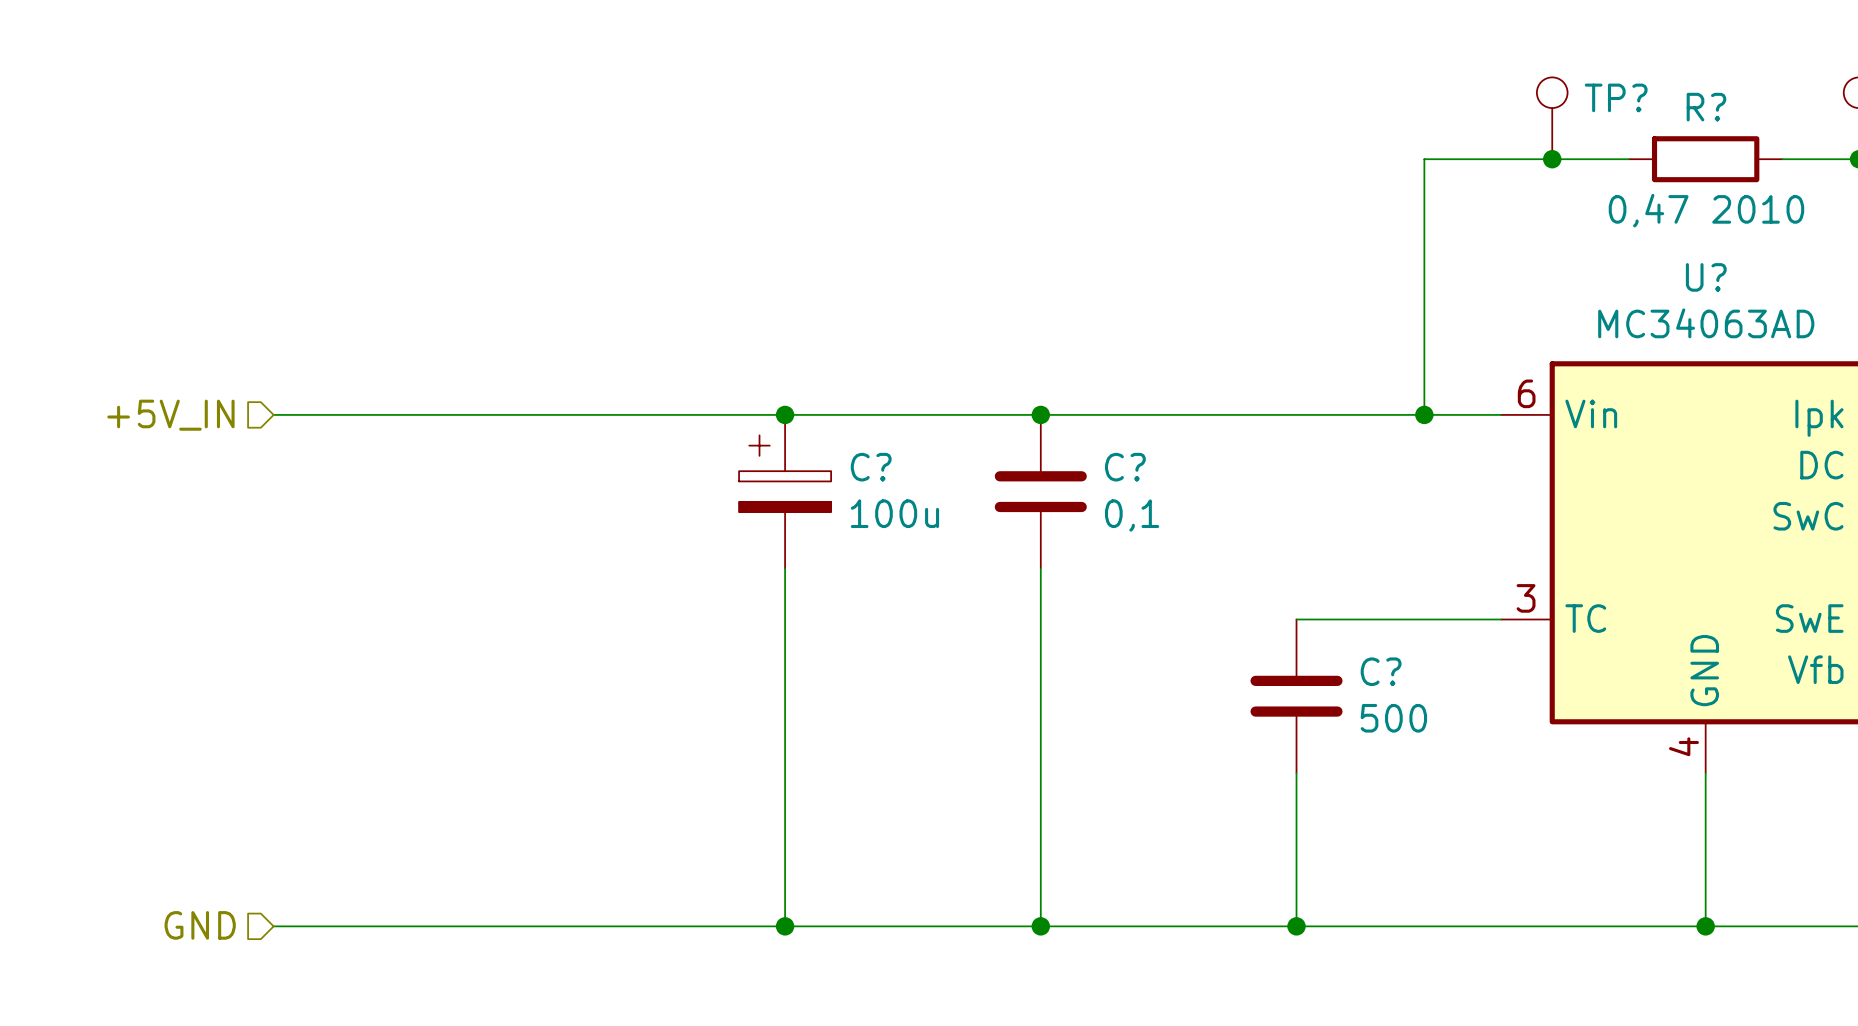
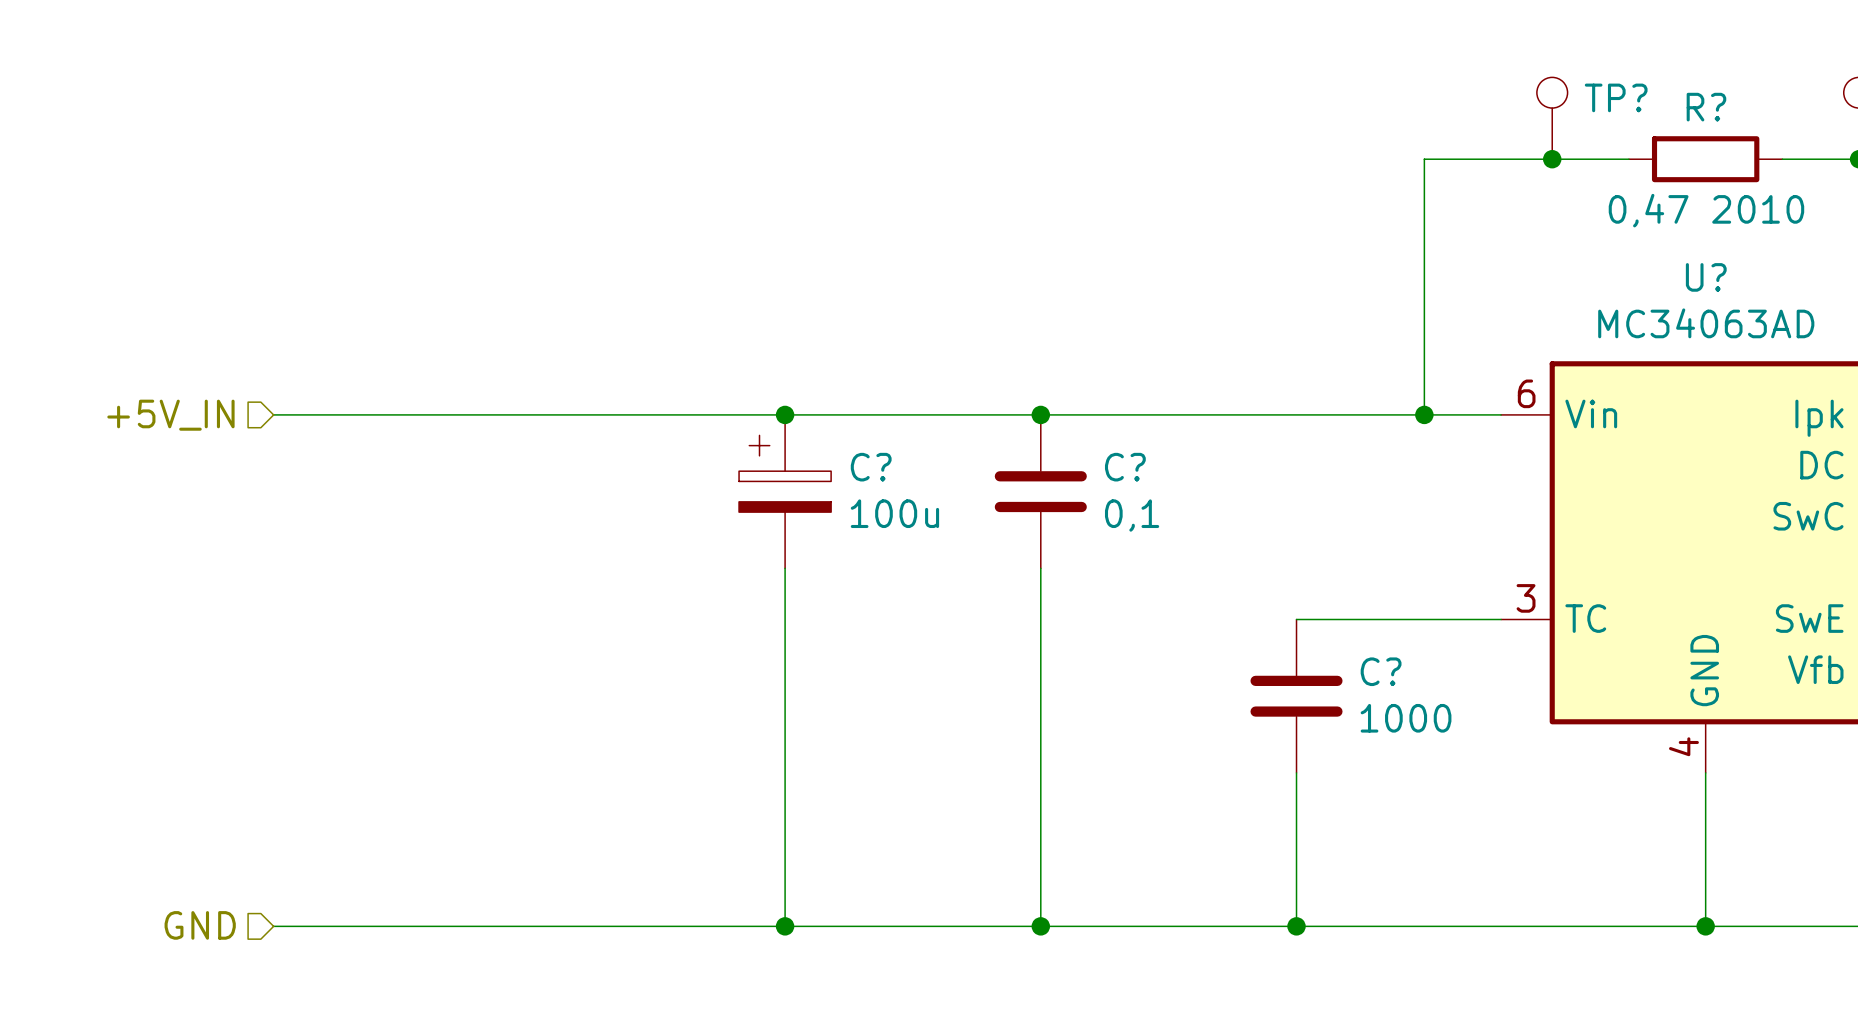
C? value: 500 (1393, 718) -> 1000 (1406, 718)

